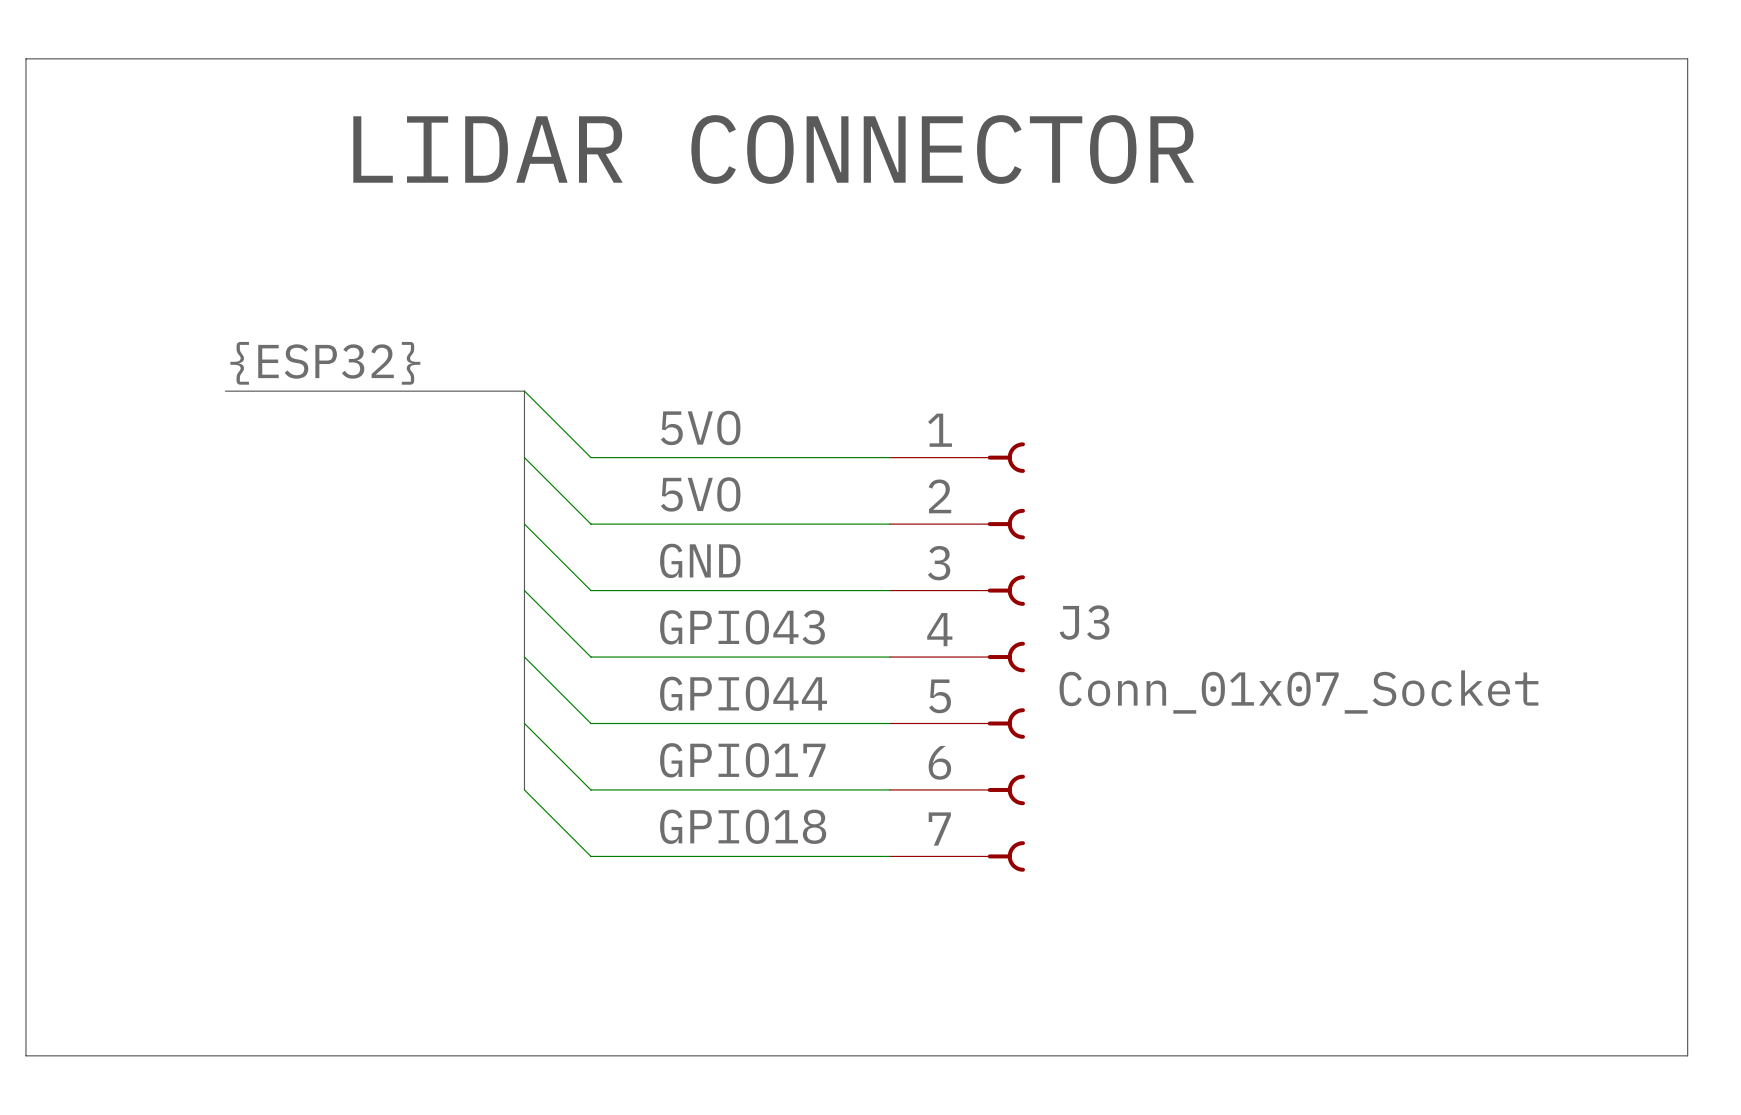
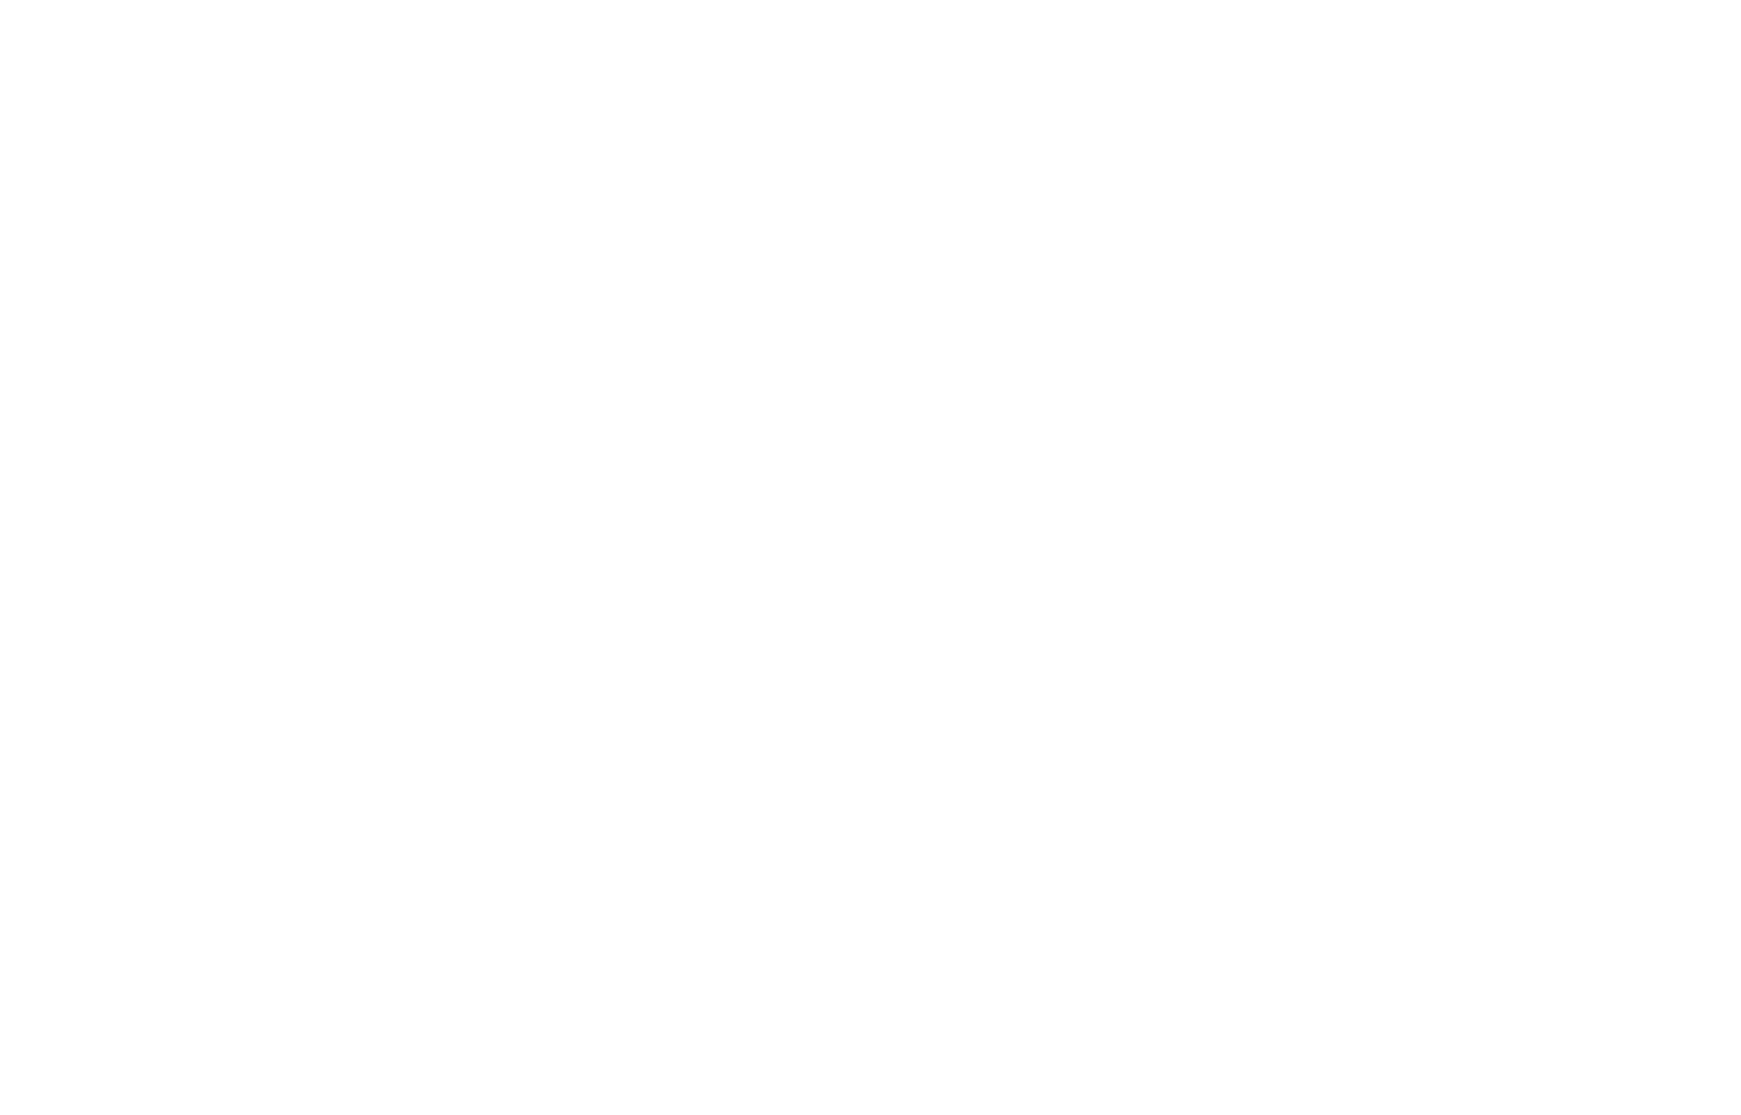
line: (25, 58) (1687, 58) (1687, 1055) (25, 1055) (25, 58) -> none
text: LIDAR CONNECTOR (773, 149) -> none
label: {ESP32} (325, 363) -> none
bus: (225, 391) (524, 391) (524, 789) -> none
wire: (524, 391) (590, 457) (890, 457) -> none
label: 5VO (700, 427) -> none
wire: (524, 457) (590, 524) (890, 524) -> none
label: 5VO (700, 494) -> none
wire: (524, 524) (590, 590) (890, 590) -> none
label: GND (700, 560) -> none
wire: (524, 590) (590, 657) (890, 657) -> none
label: GPIO43 (742, 627) -> none
wire: (524, 657) (590, 723) (890, 723) -> none
J3: Conn_01x07_Socket (957, 657) -> none
label: GPIO44 (743, 693) -> none
wire: (524, 723) (590, 789) (890, 789) -> none
label: GPIO17 (742, 760) -> none
wire: (524, 789) (590, 856) (890, 856) -> none
label: GPIO18 (743, 826) -> none

